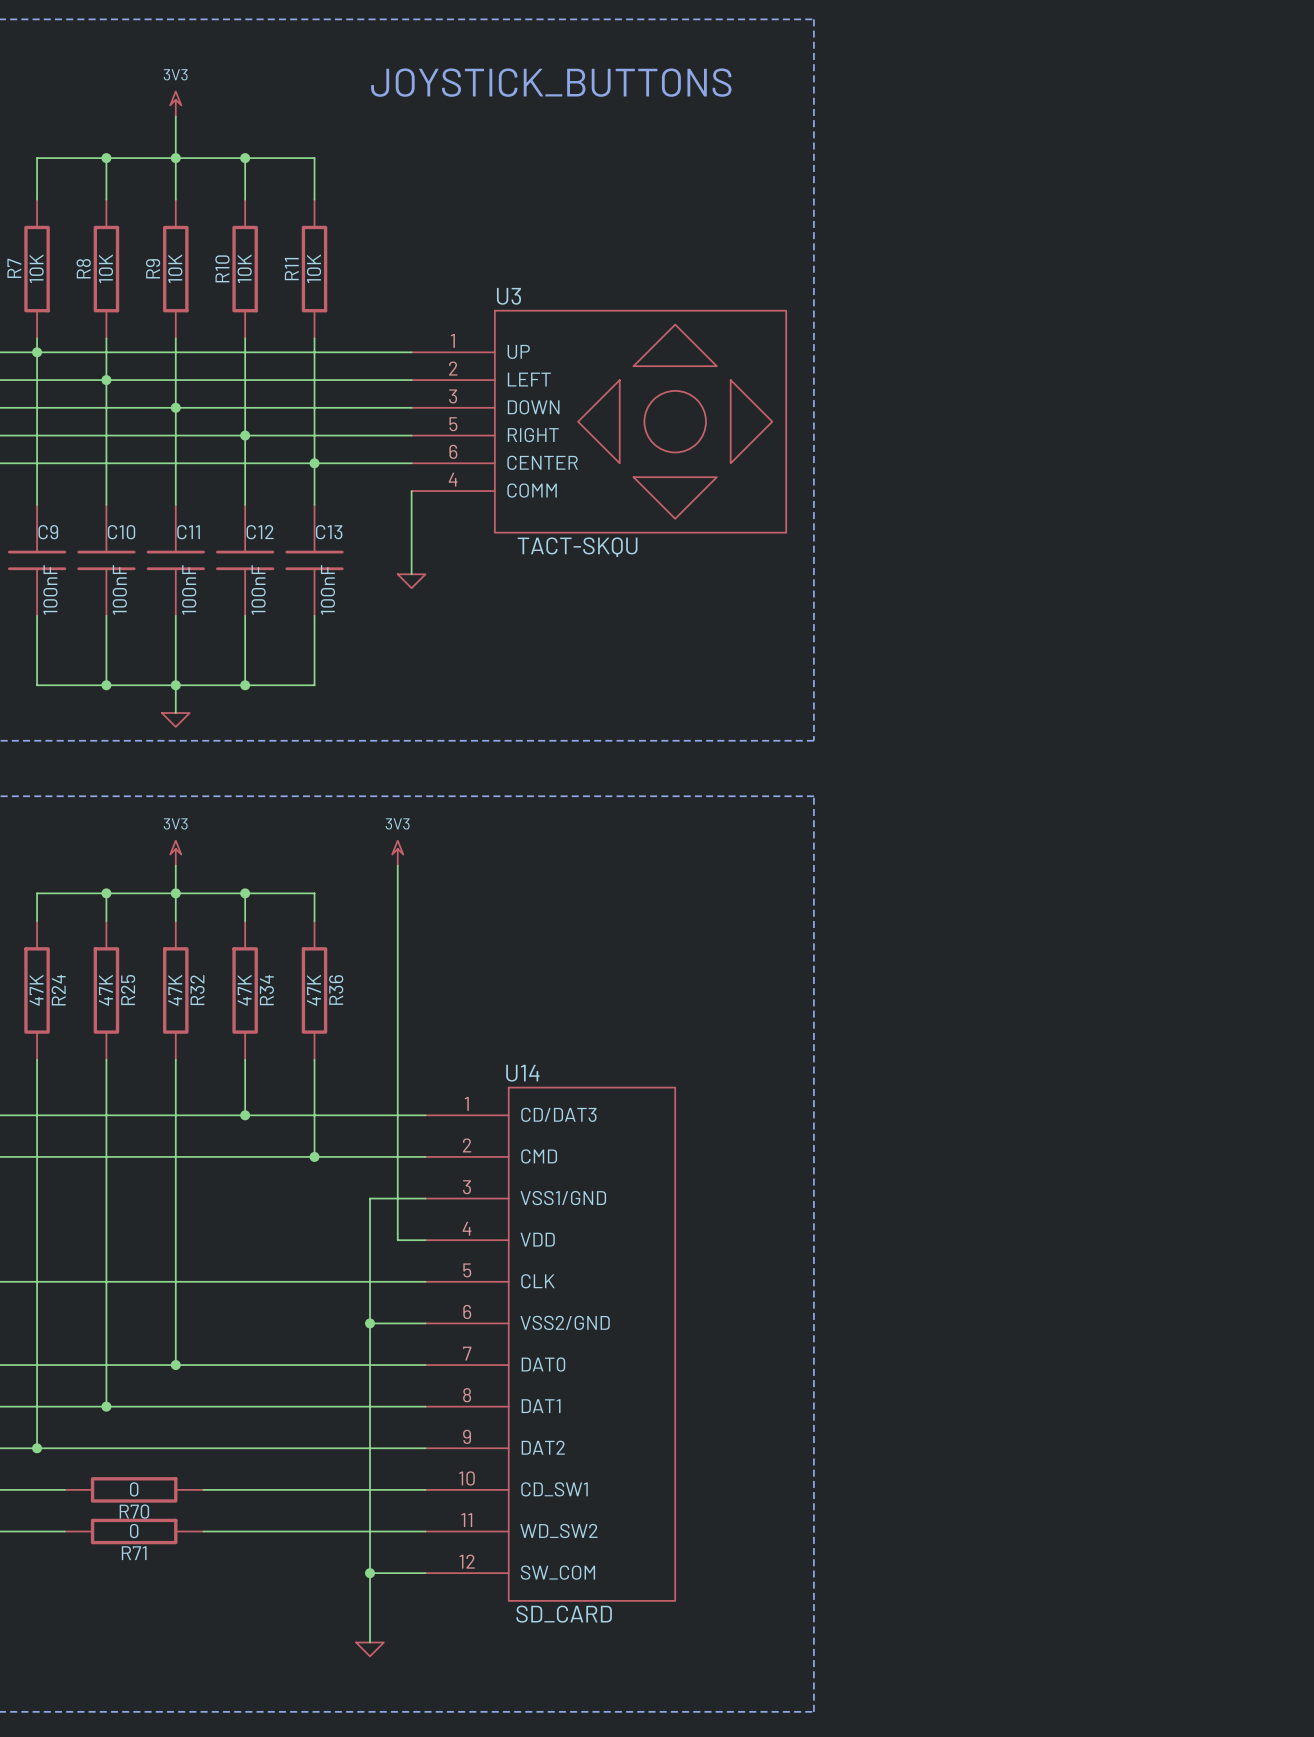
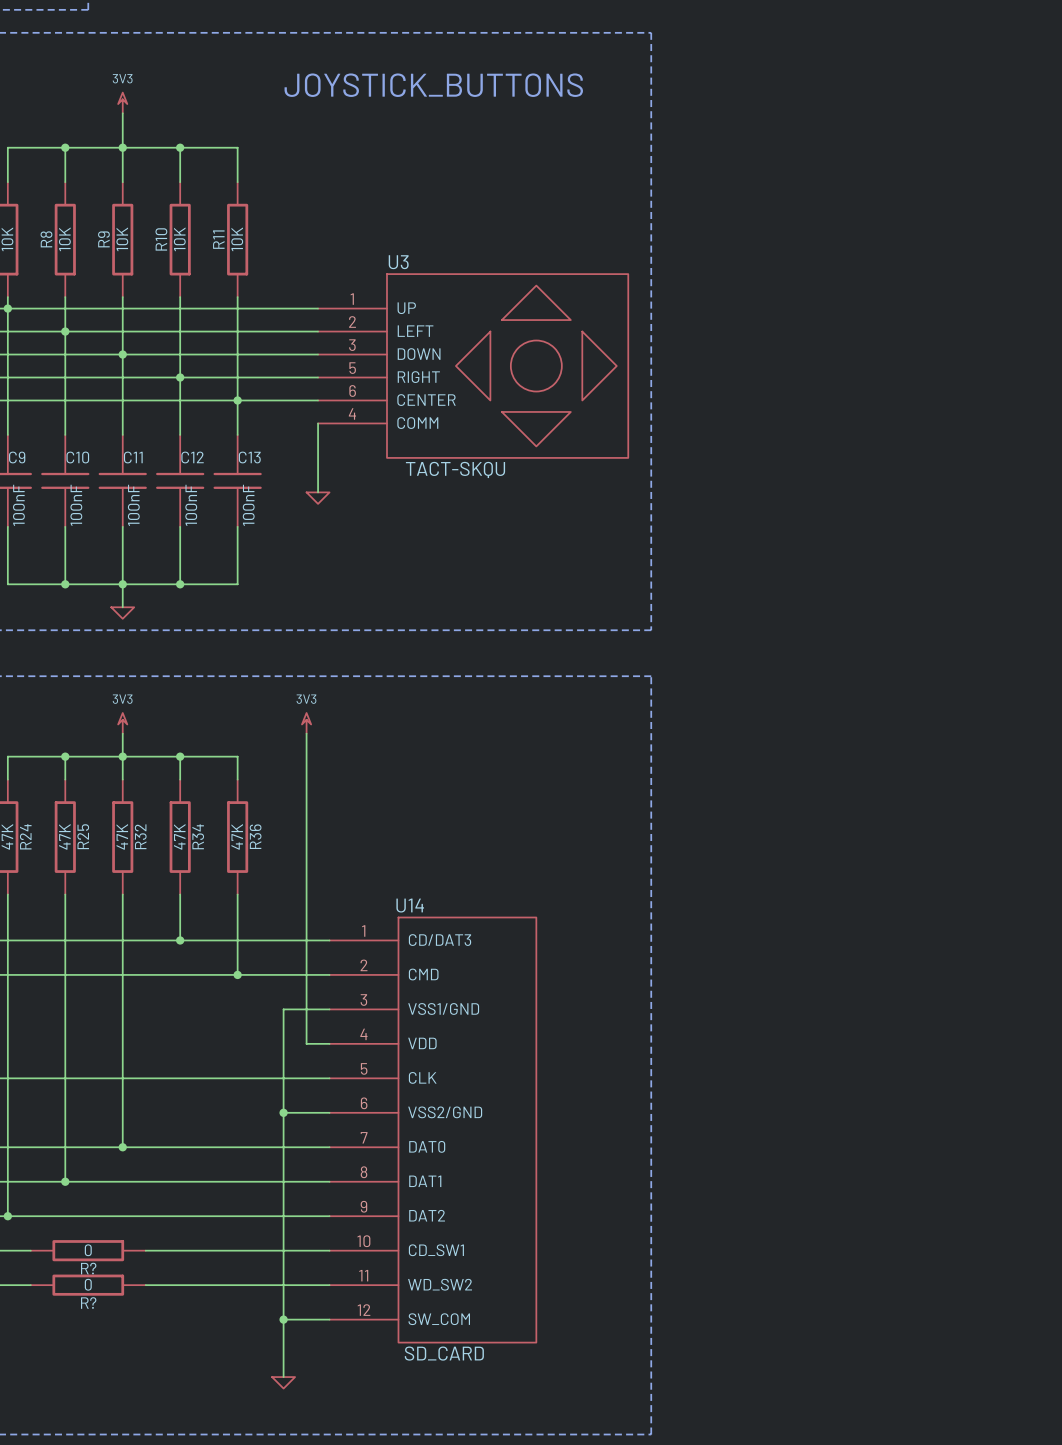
R70 name: R70 (134, 1511) -> R? (88, 1268)
R71 name: R71 (134, 1553) -> R? (88, 1303)

